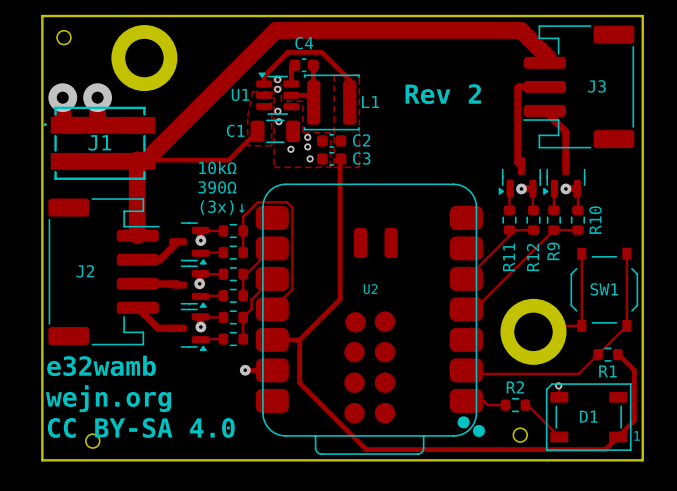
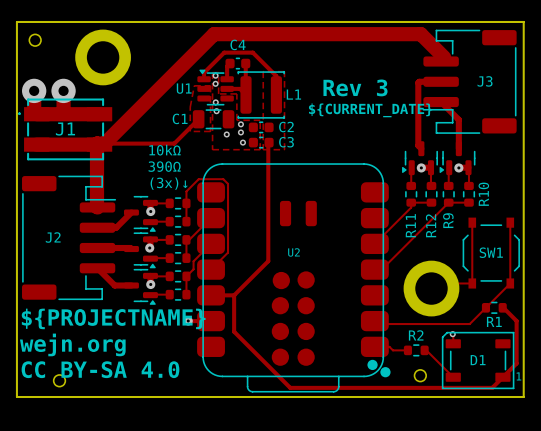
text: Rev 2 (443, 94) -> Rev 3 (355, 87)
text: none -> ${CURRENT_DATE} (370, 110)
text: e32wamb (101, 365) -> ${PROJECTNAME} (113, 318)

